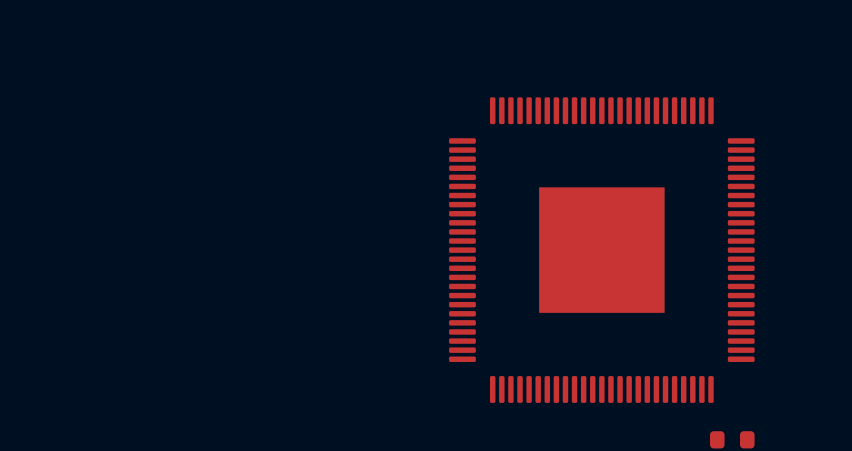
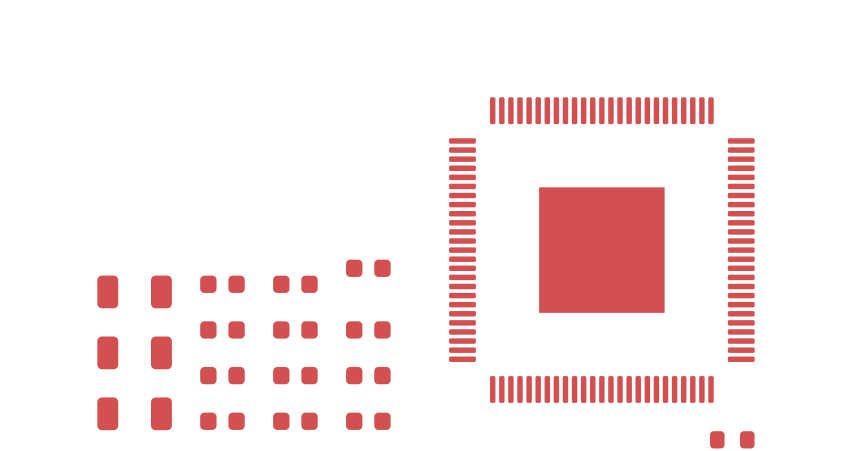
part: none -> (368, 268)
part: none -> (222, 284)
part: none -> (295, 284)
part: none -> (134, 291)
part: none -> (222, 329)
part: none -> (295, 329)
part: none -> (368, 329)
part: none -> (134, 352)
part: none -> (222, 375)
part: none -> (295, 375)
part: none -> (368, 375)
part: none -> (134, 413)
part: none -> (222, 421)
part: none -> (295, 421)
part: none -> (368, 421)

